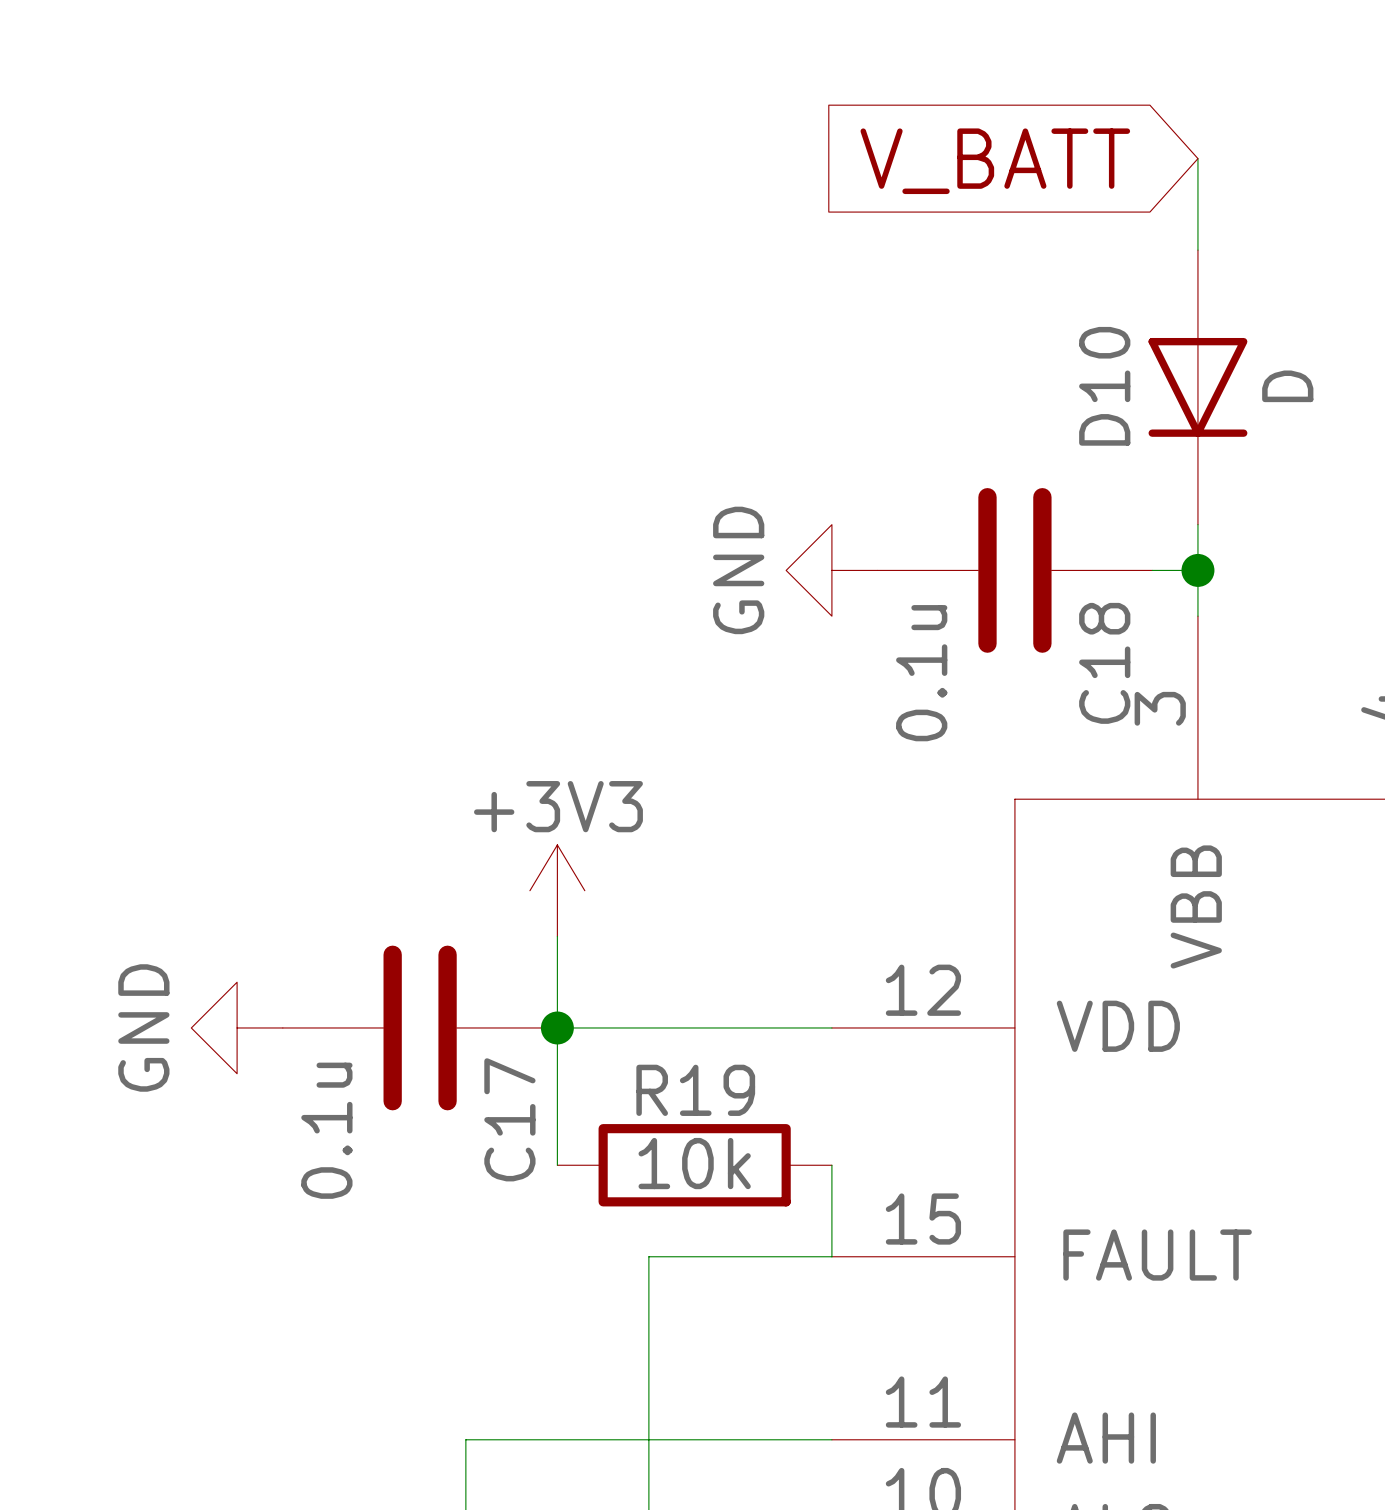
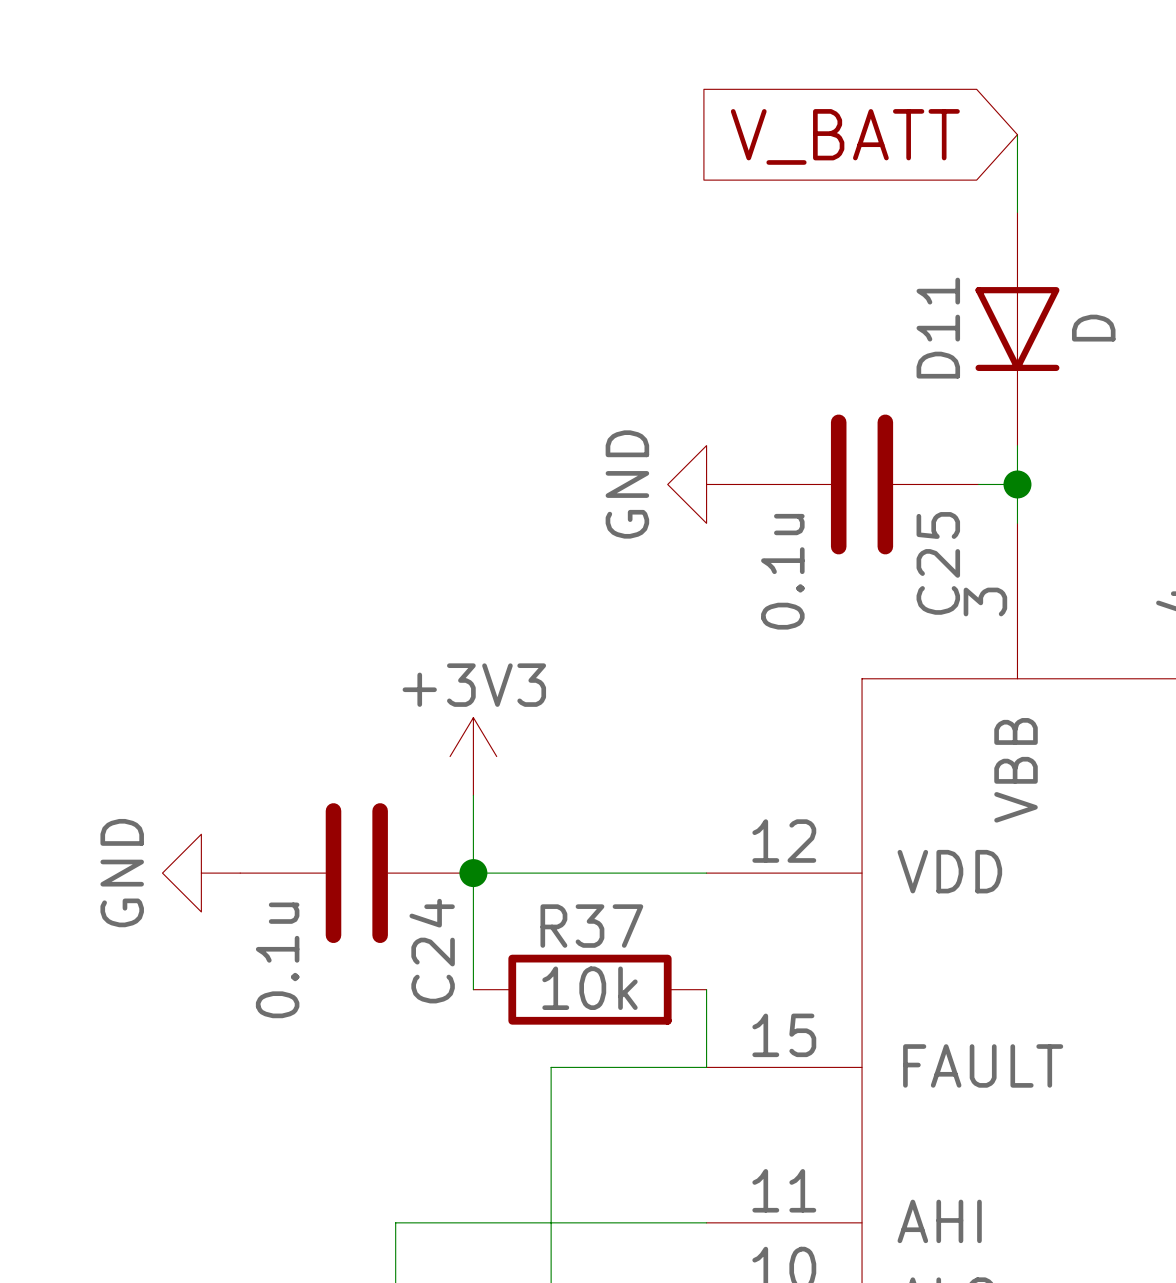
D10 name: D10 (1104, 386) -> D11 (938, 328)
C18 name: C18 (1104, 663) -> C25 (938, 563)
R19 name: R19 (695, 1090) -> R37 (591, 926)
C17 name: C17 (509, 1119) -> C24 (432, 951)

